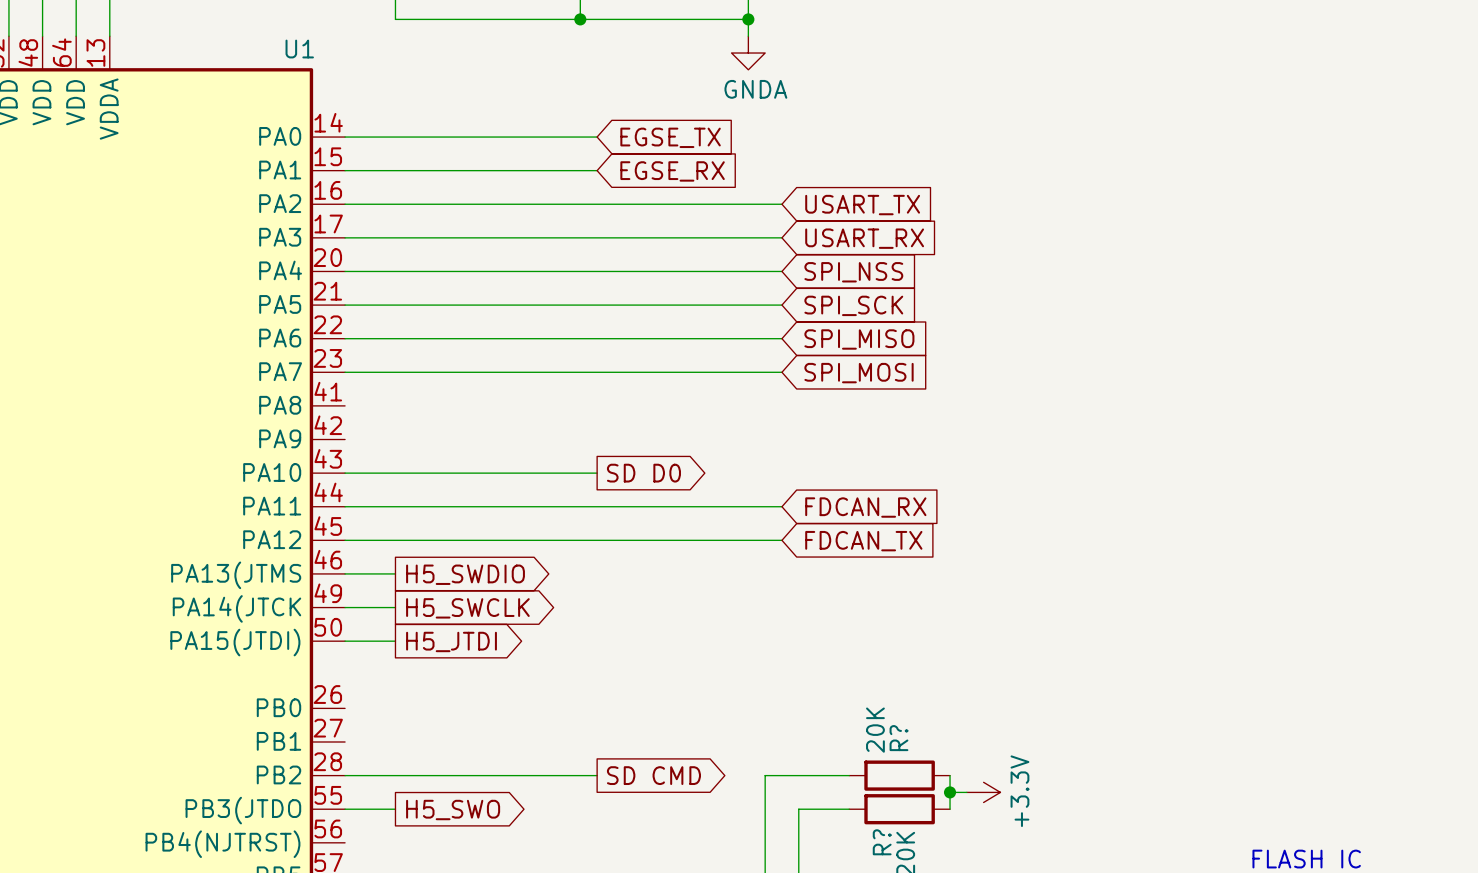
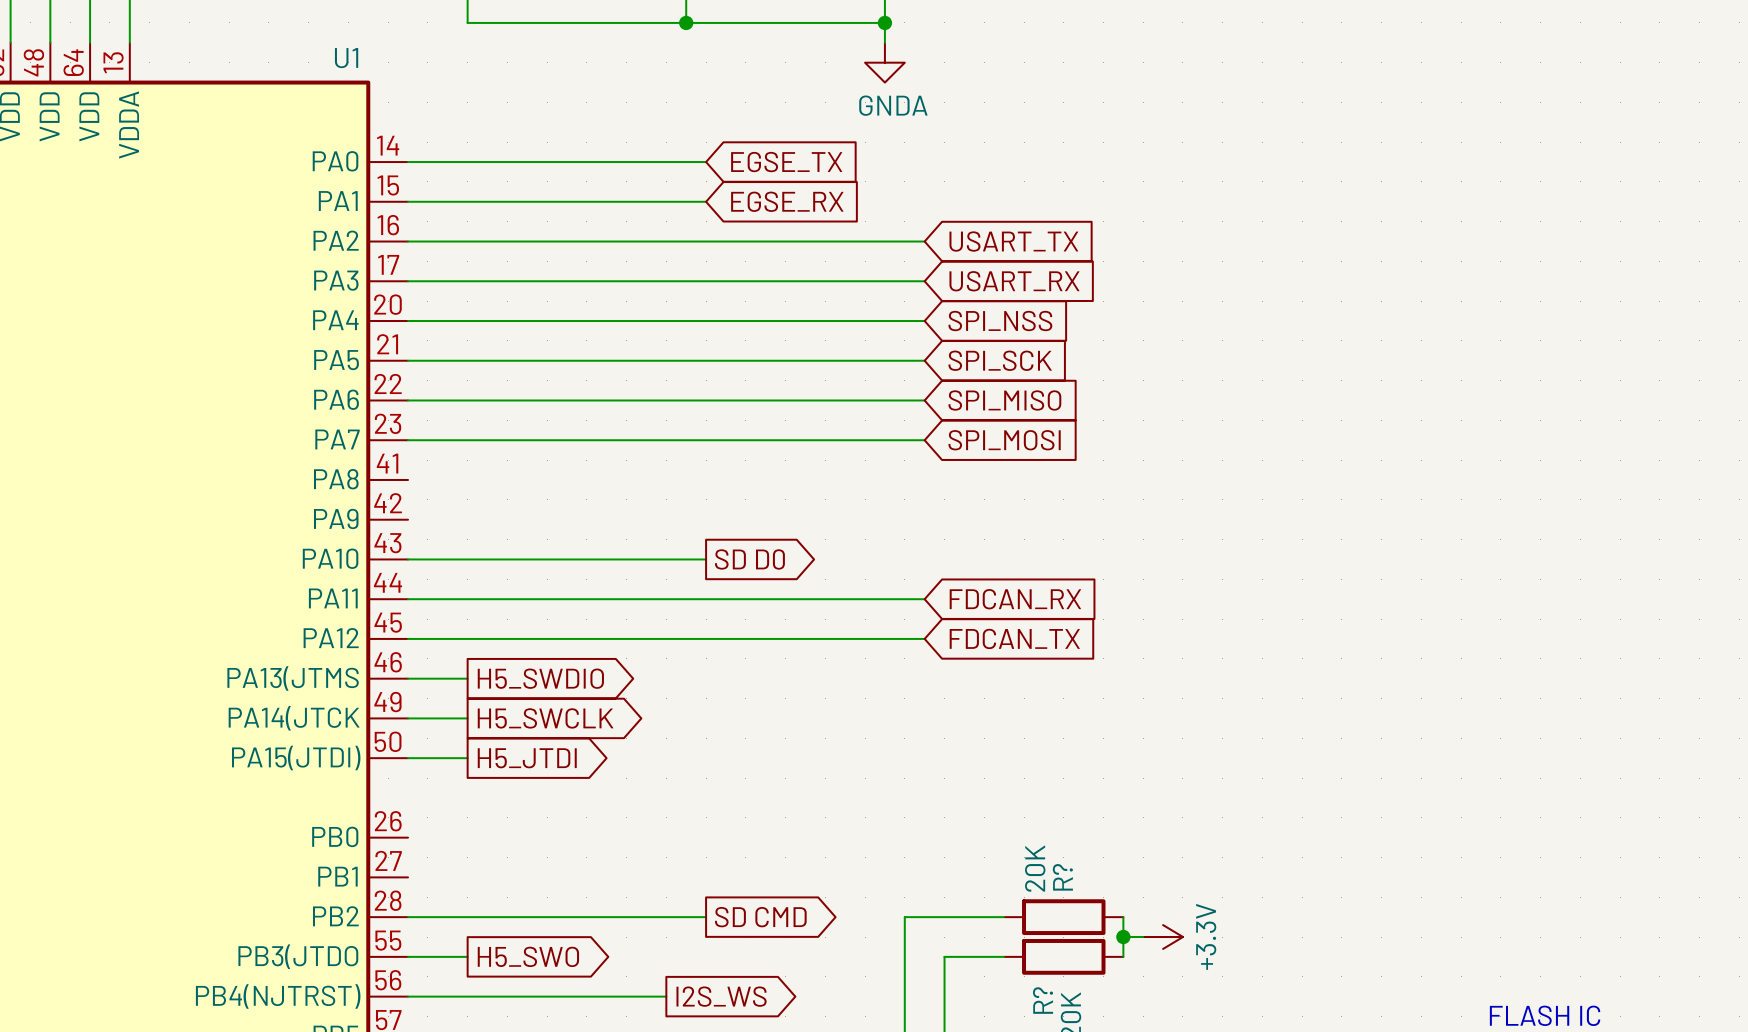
wire: none -> (408, 996) (666, 996)
global label: none -> I2S_WS (721, 996)

